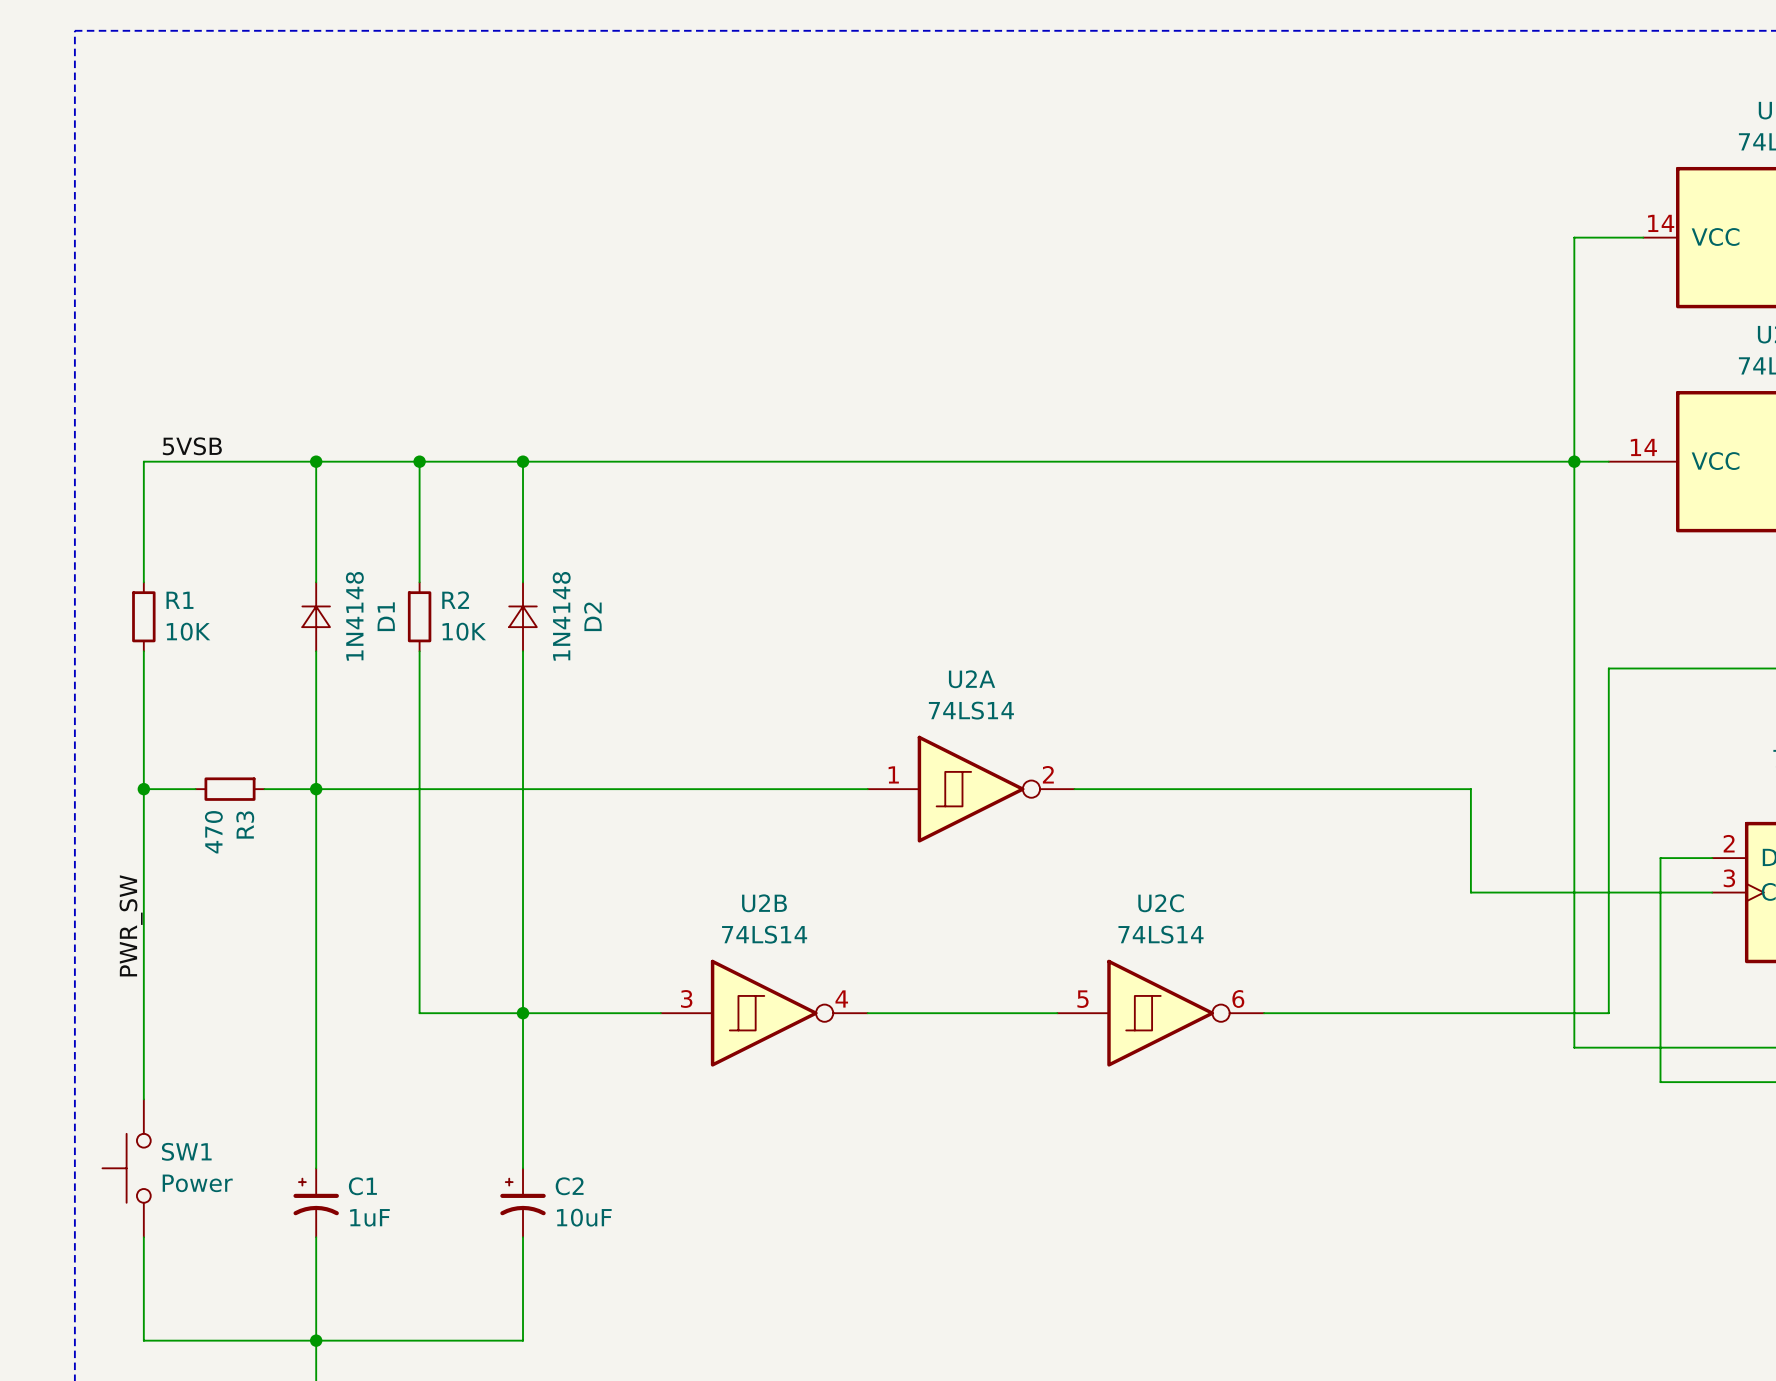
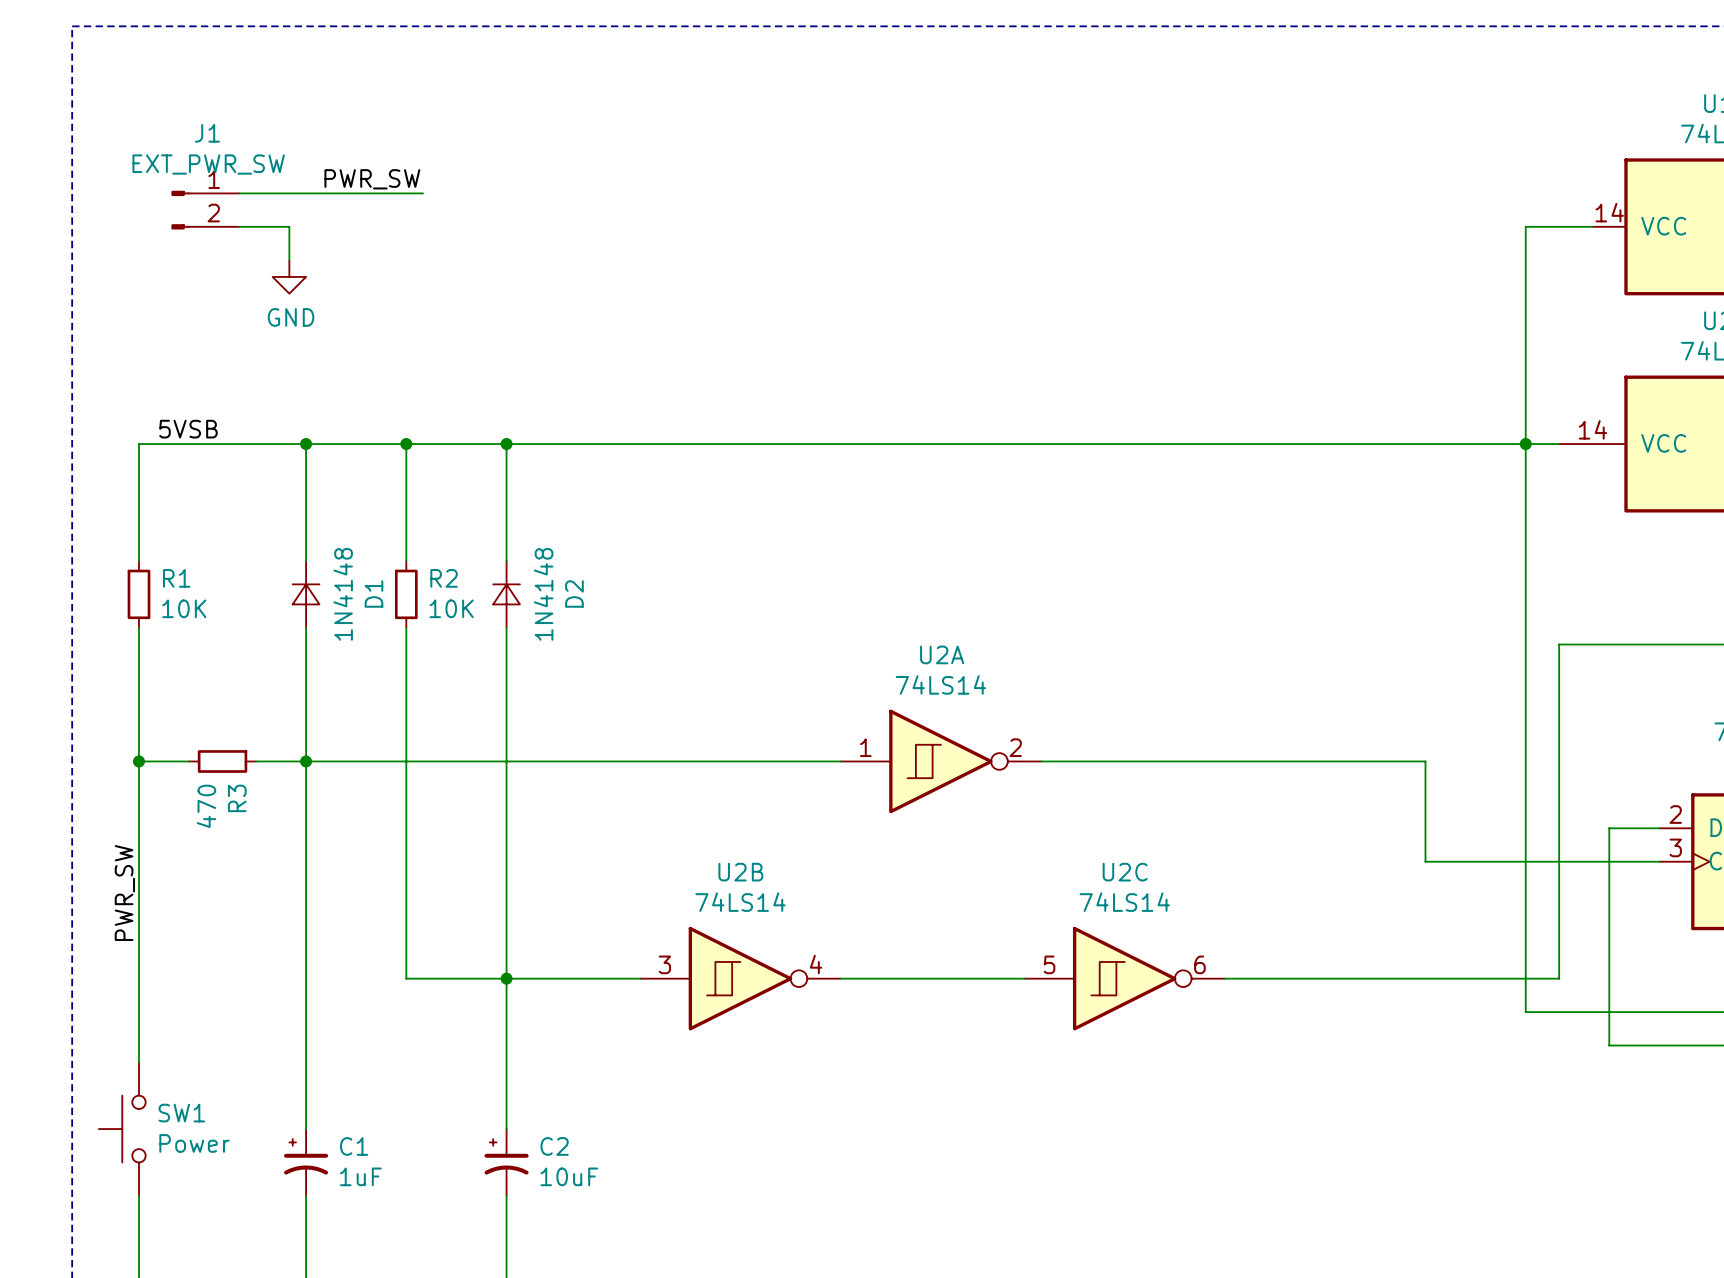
label: none -> PWR_SW (372, 179)
wire: none -> (239, 193) (423, 193)
J1: none -> EXT_PWR_SW (205, 210)
wire: none -> (239, 226) (289, 226) (289, 260)
power symbol: none -> GND (289, 276)

